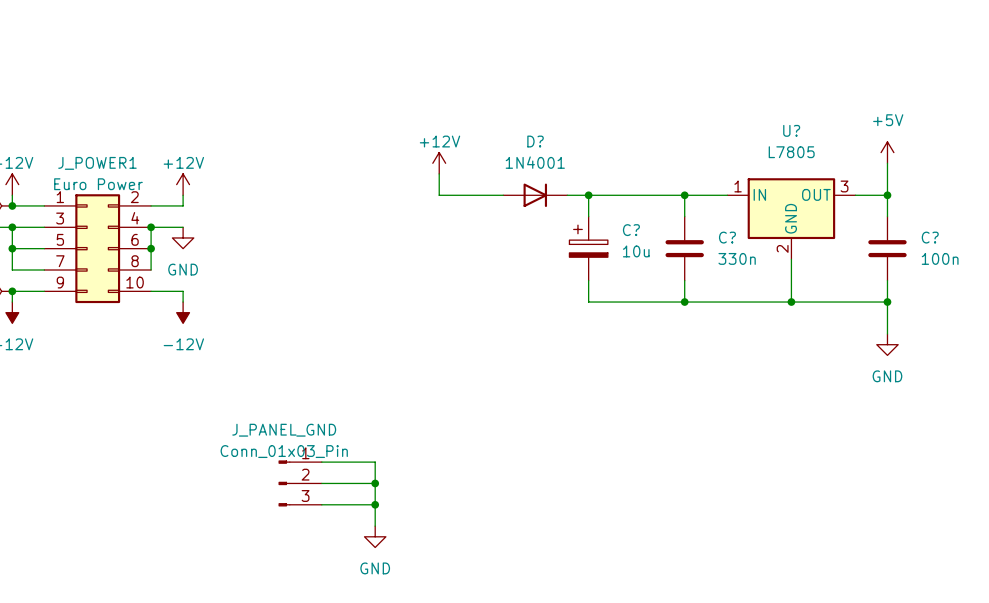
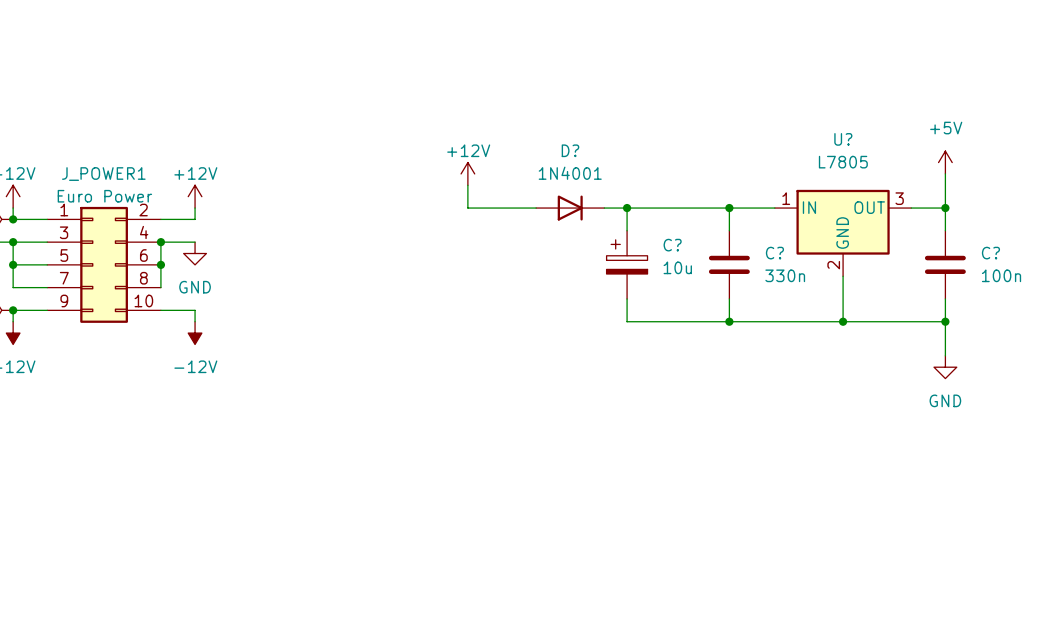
wire: (321, 462) (375, 462) (375, 526) -> none
J_PANEL_GND: Conn_01x03_Pin (300, 483) -> none
wire: (321, 483) (375, 483) -> none
junction: (375, 483) -> none
wire: (321, 504) (375, 504) -> none
junction: (375, 504) -> none
power symbol: GND (375, 536) -> none

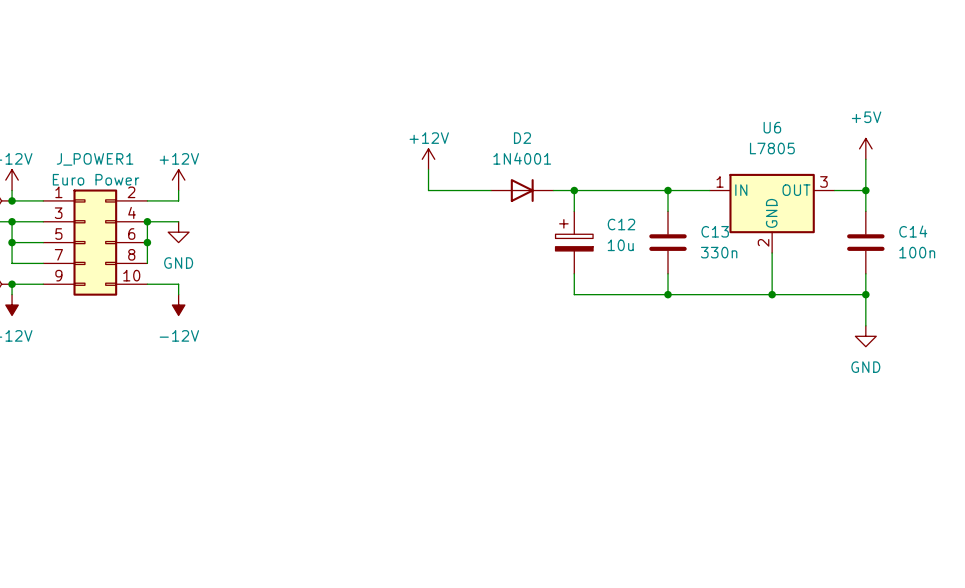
U? name: U? (843, 139) -> U6 (772, 127)
D? name: D? (570, 150) -> D2 (522, 138)
C? name: C? (672, 245) -> C12 (621, 224)
C? name: C? (774, 253) -> C13 (715, 231)
C? name: C? (990, 253) -> C14 (913, 231)

